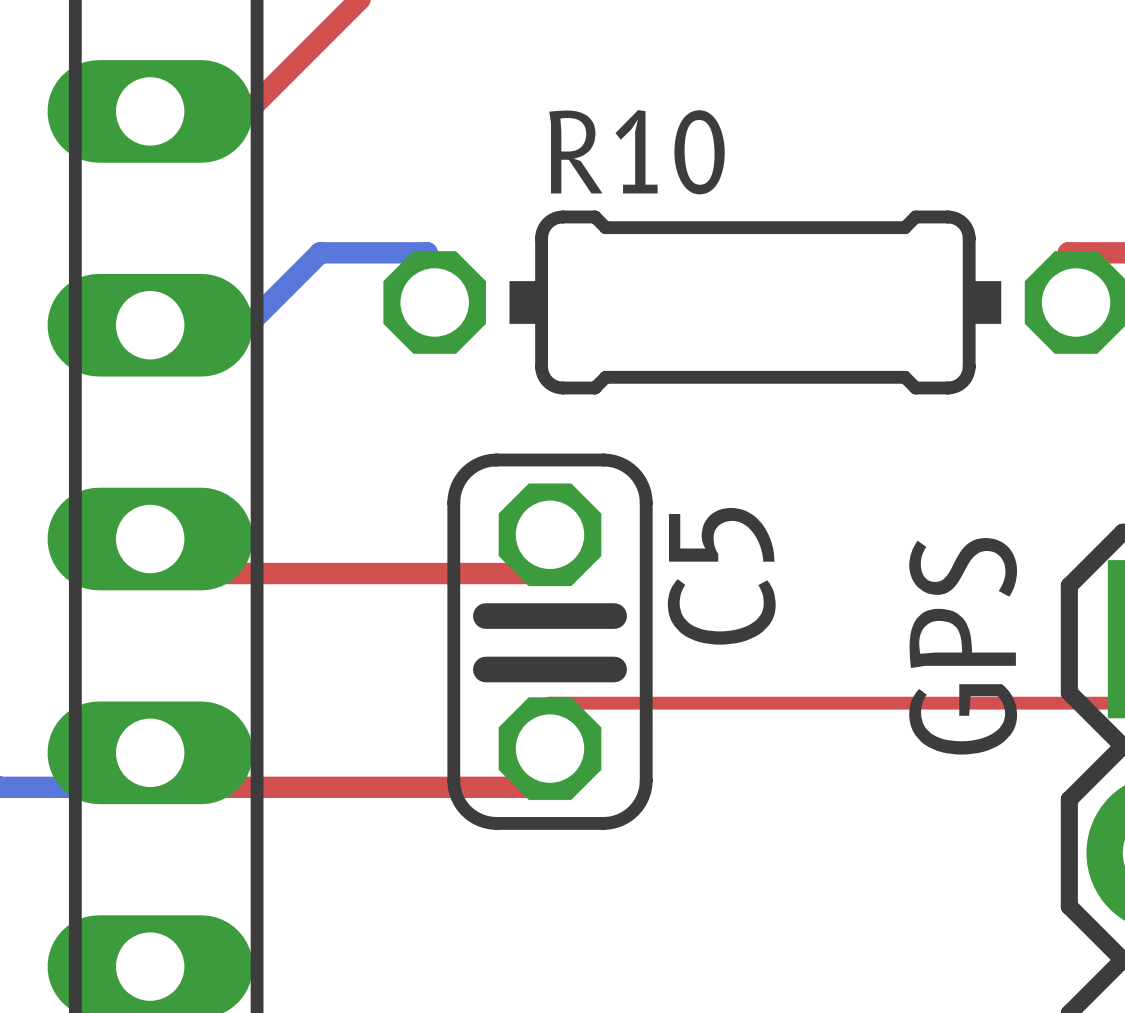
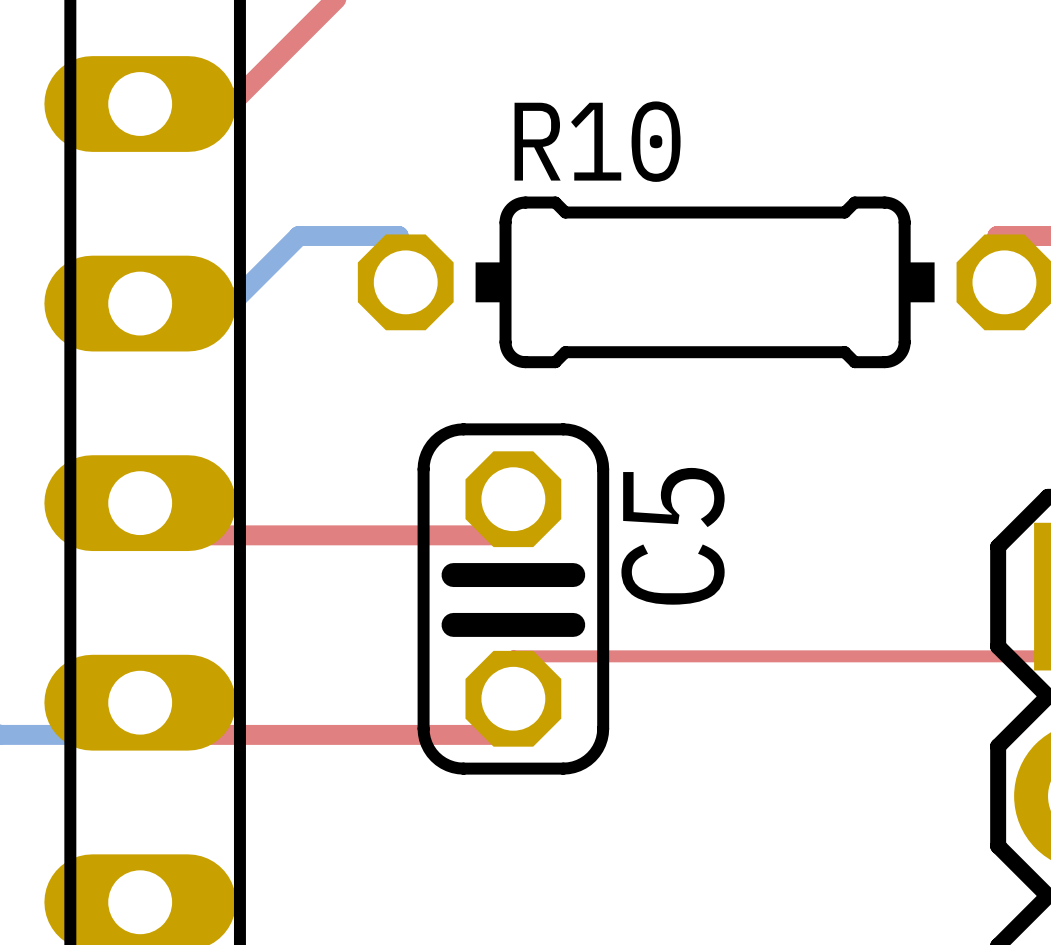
part value: GPS (963, 646) -> none

